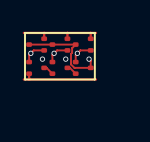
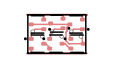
part footprint: [26, 36, 48, 53] -> [28, 15, 52, 34]
part footprint: [49, 36, 71, 53] -> [48, 14, 71, 33]
part footprint: [72, 36, 94, 53] -> [67, 15, 90, 34]
part footprint: [26, 59, 48, 77] -> [23, 34, 47, 53]
part footprint: [49, 59, 71, 77] -> [42, 34, 65, 53]
part footprint: [72, 59, 94, 77] -> [63, 34, 86, 53]

